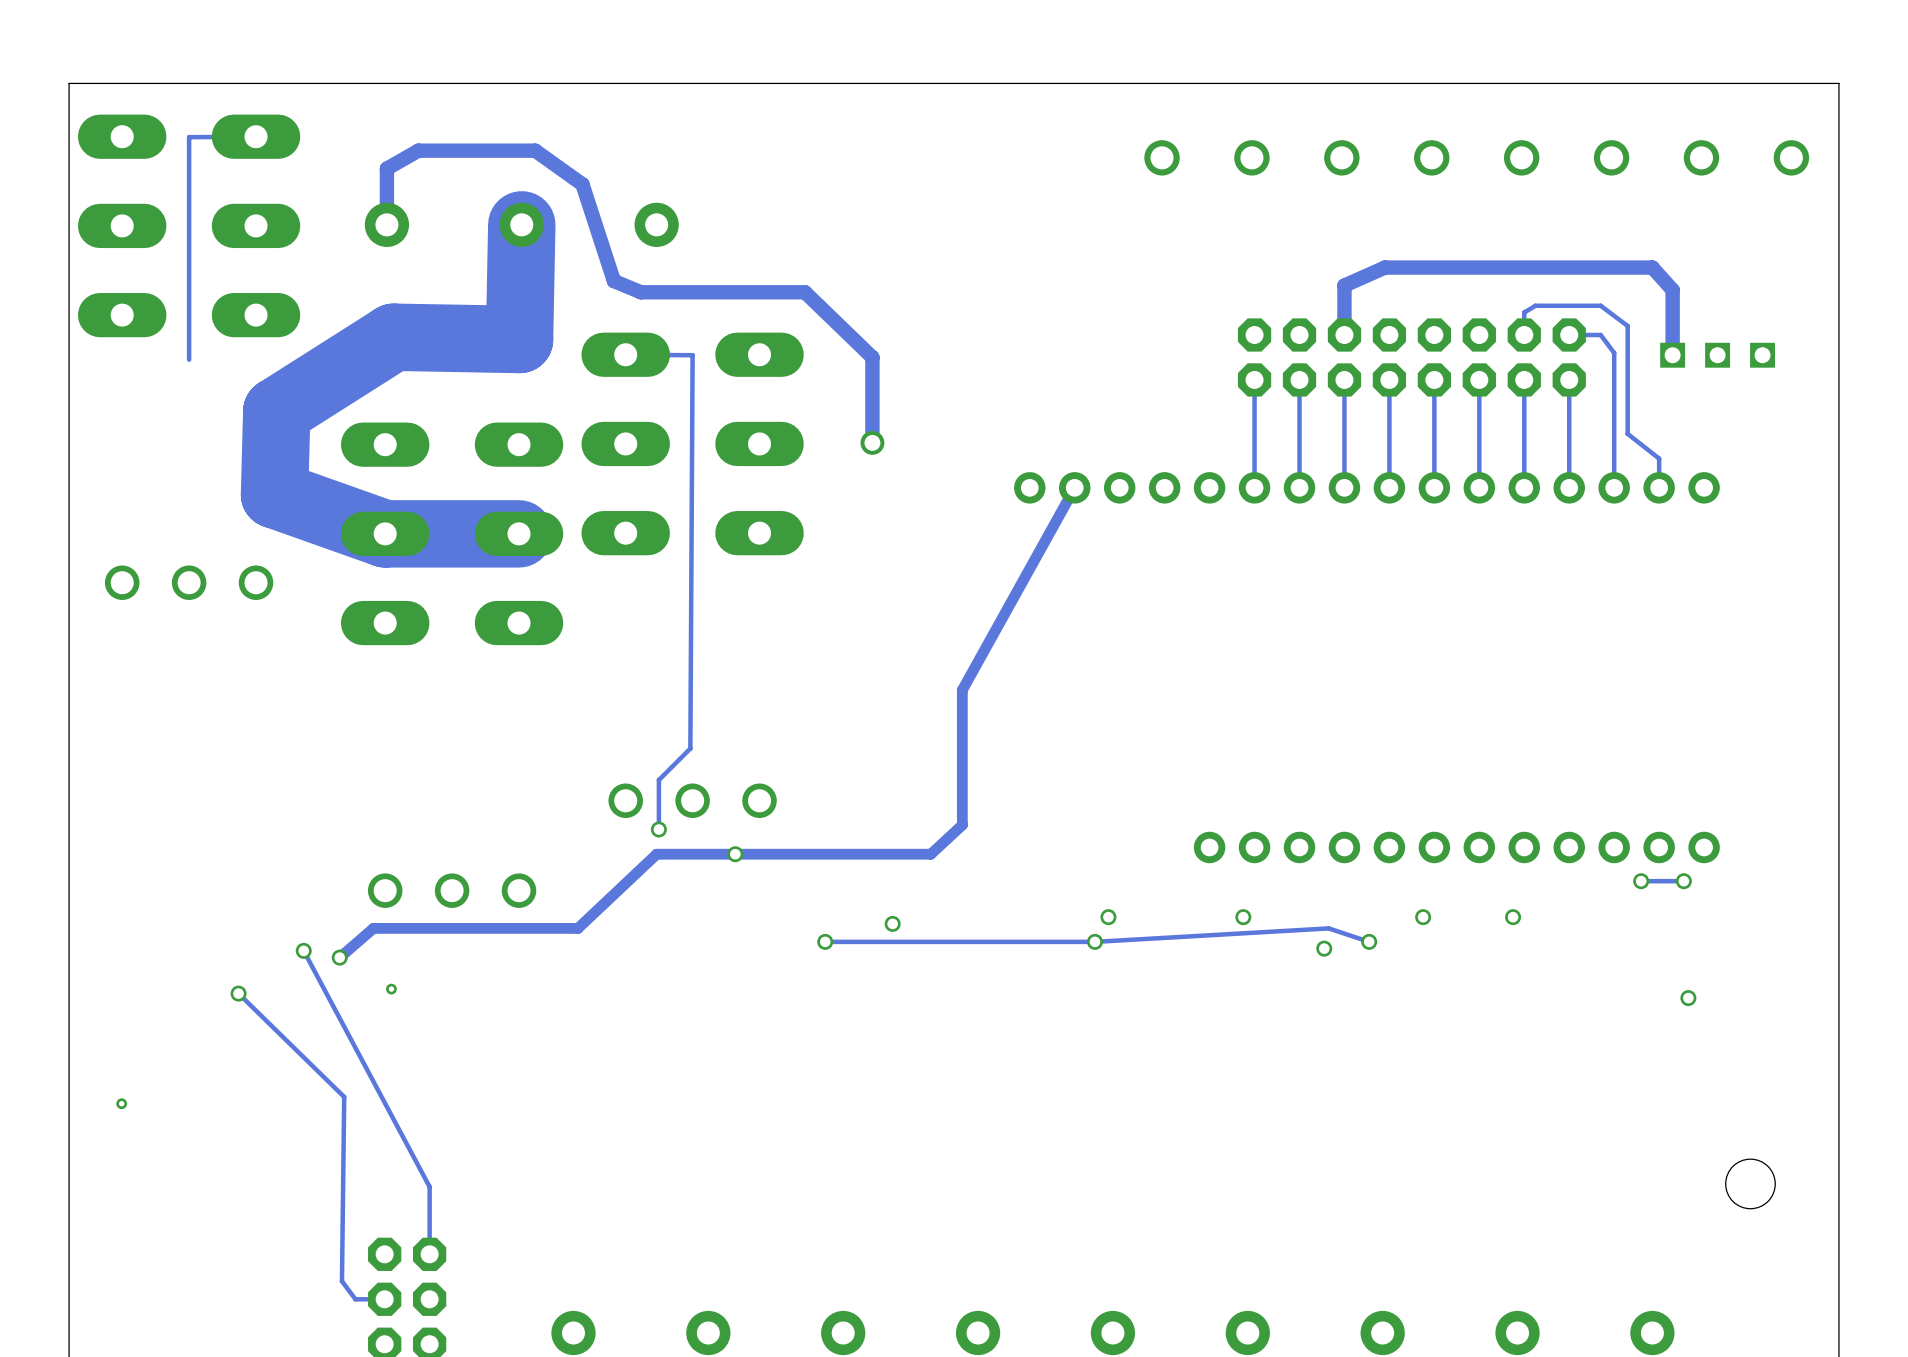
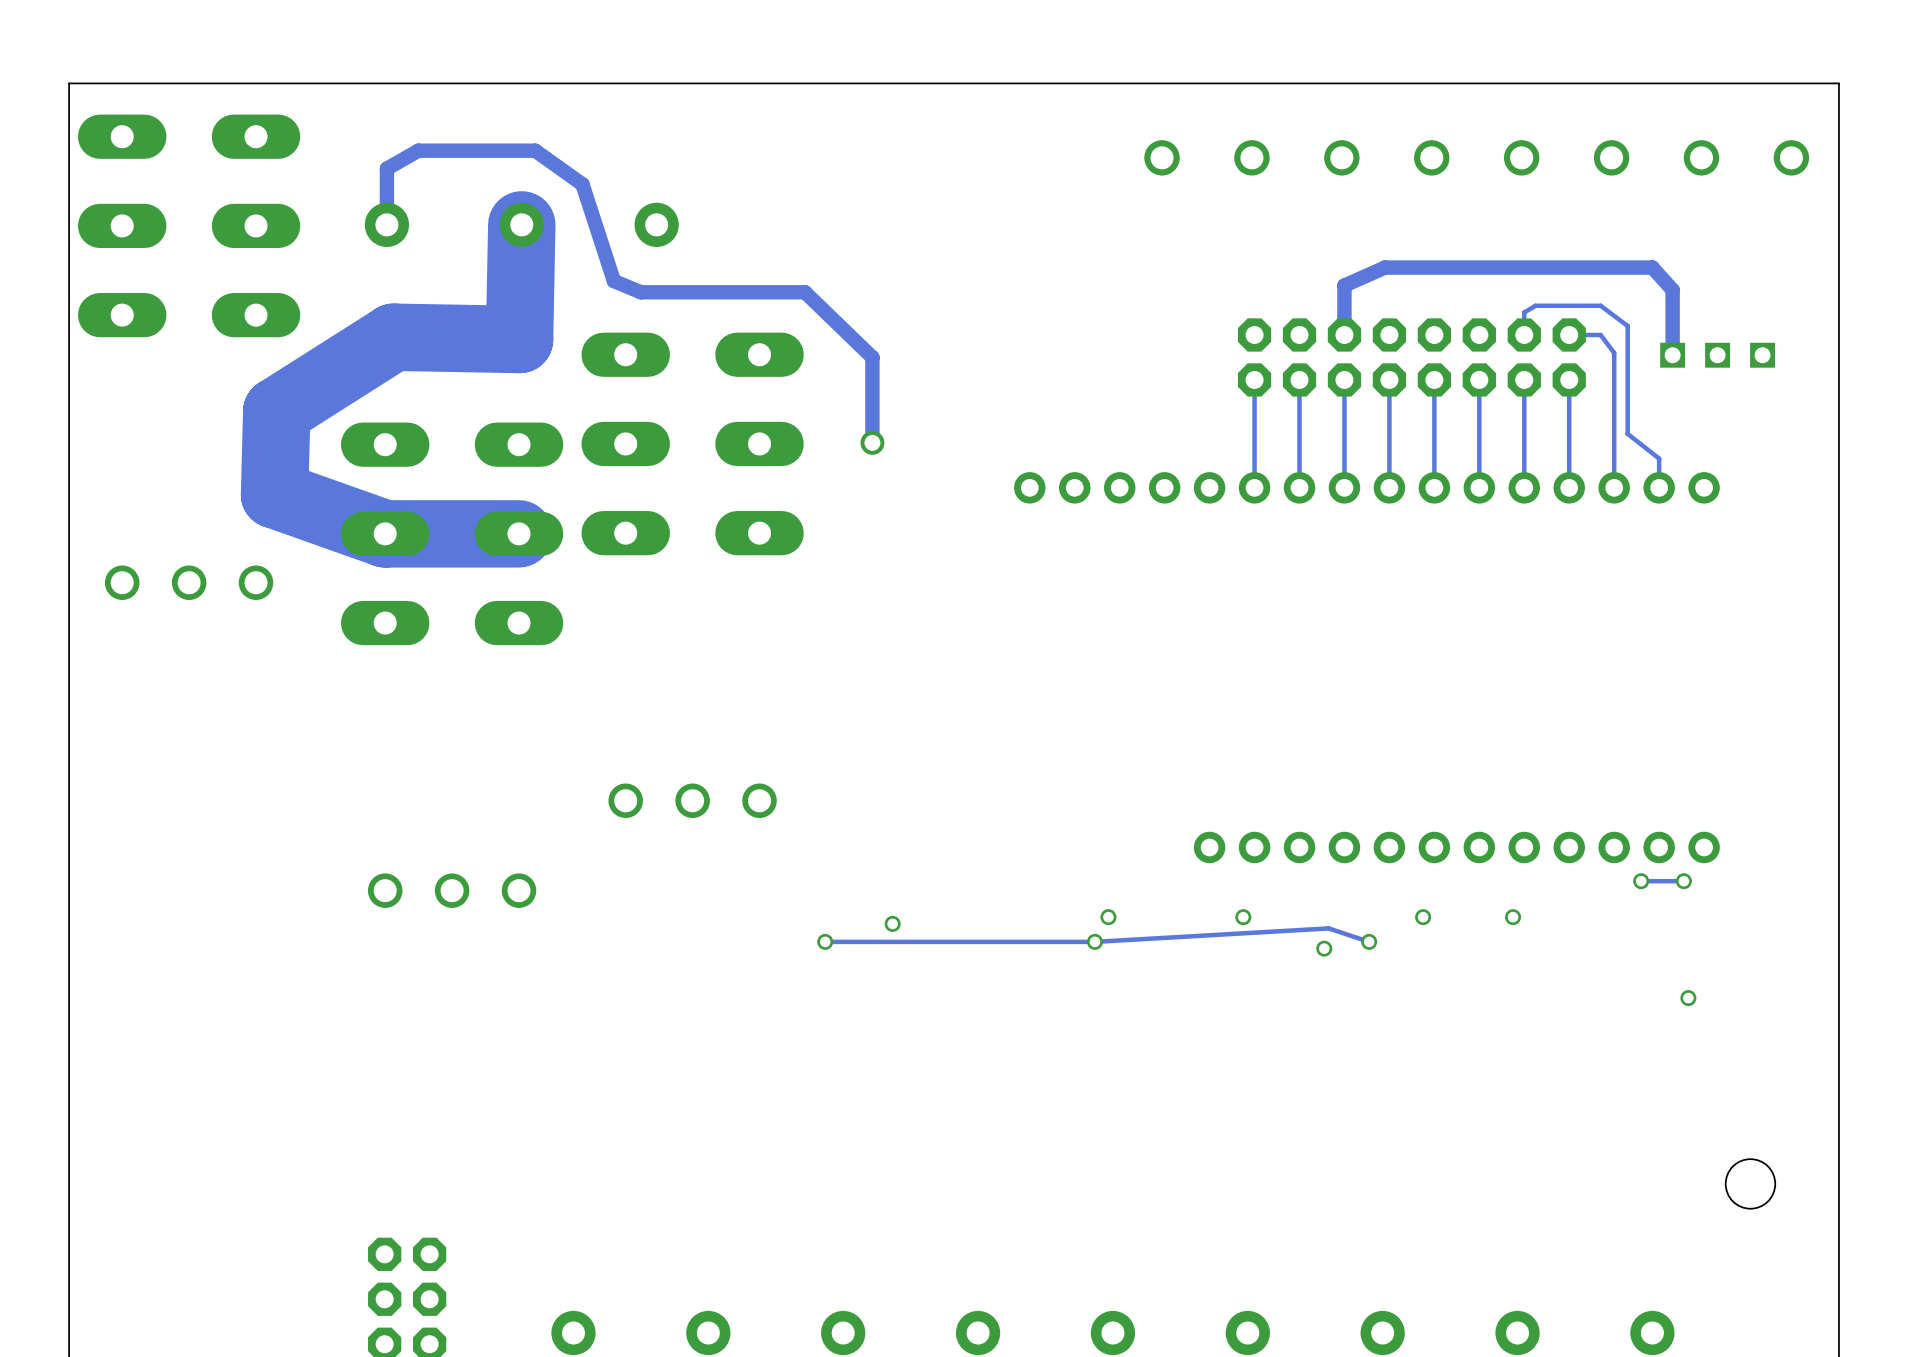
track: (256, 136) (189, 137) (189, 359) -> none
track: (625, 354) (692, 355) (690, 748) (658, 780) (658, 829) -> none
track: (1074, 487) (962, 690) (962, 825) (930, 854) (656, 854) (577, 928) (373, 928) (339, 957) -> none
via: (658, 829) -> none
via: (735, 854) -> none
track: (303, 950) (429, 1186) (429, 1254) -> none
via: (303, 950) -> none
via: (339, 957) -> none
via: (391, 989) -> none
track: (238, 993) (344, 1096) (341, 1281) (355, 1299) (384, 1299) -> none
via: (238, 993) -> none
via: (121, 1103) -> none

